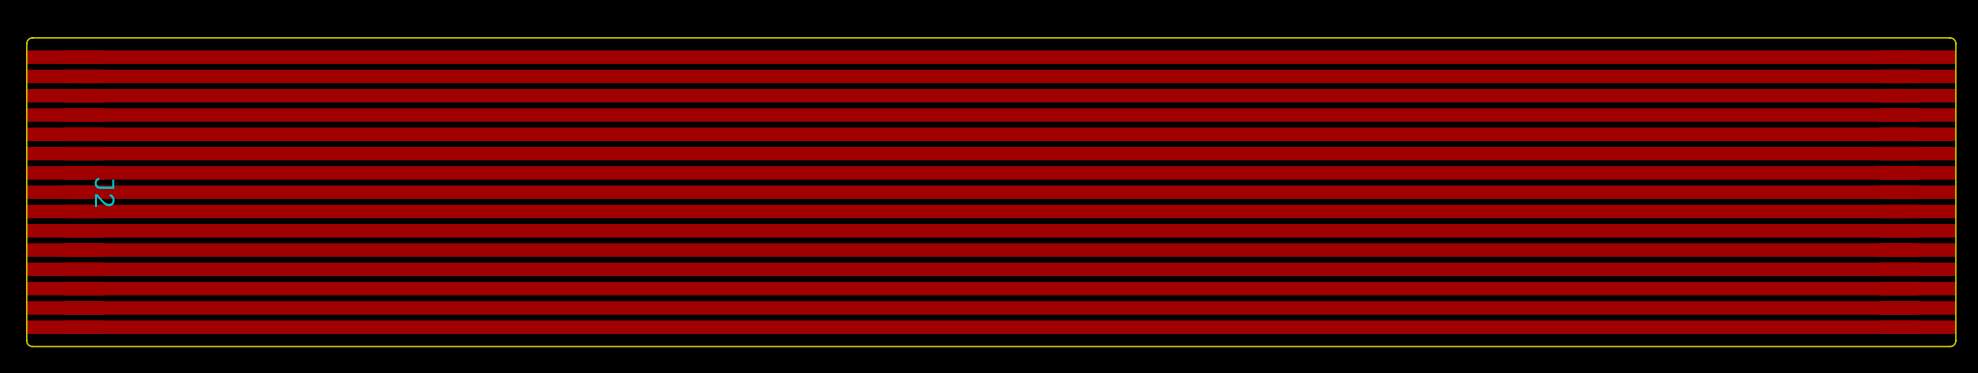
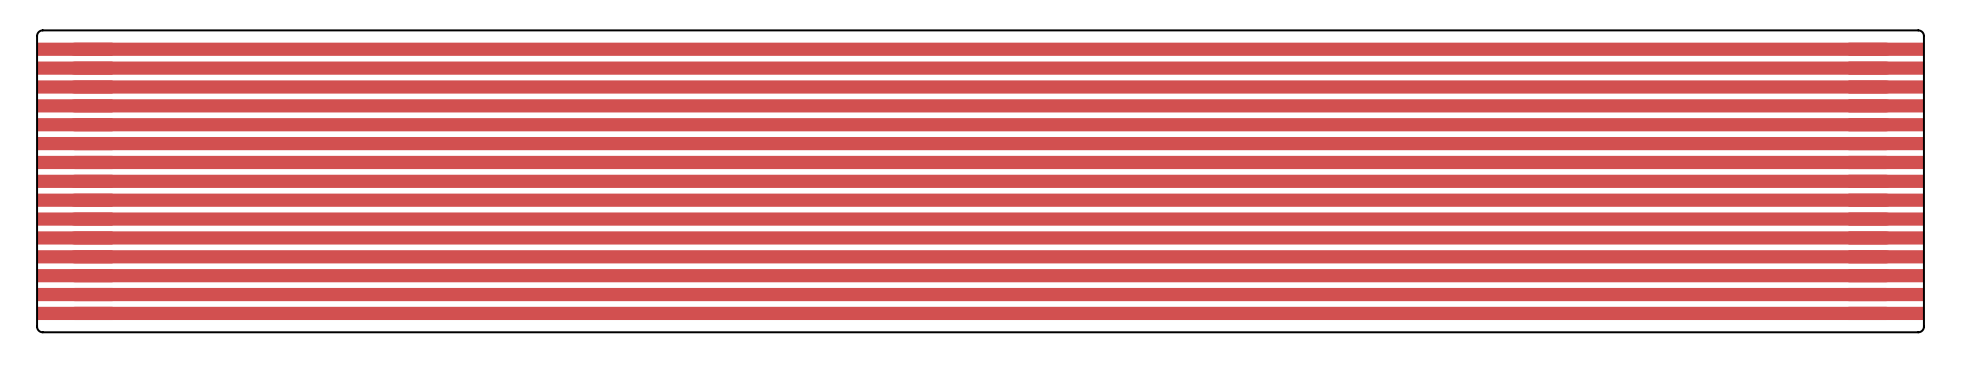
J2 name: J2 (104, 192) -> none

